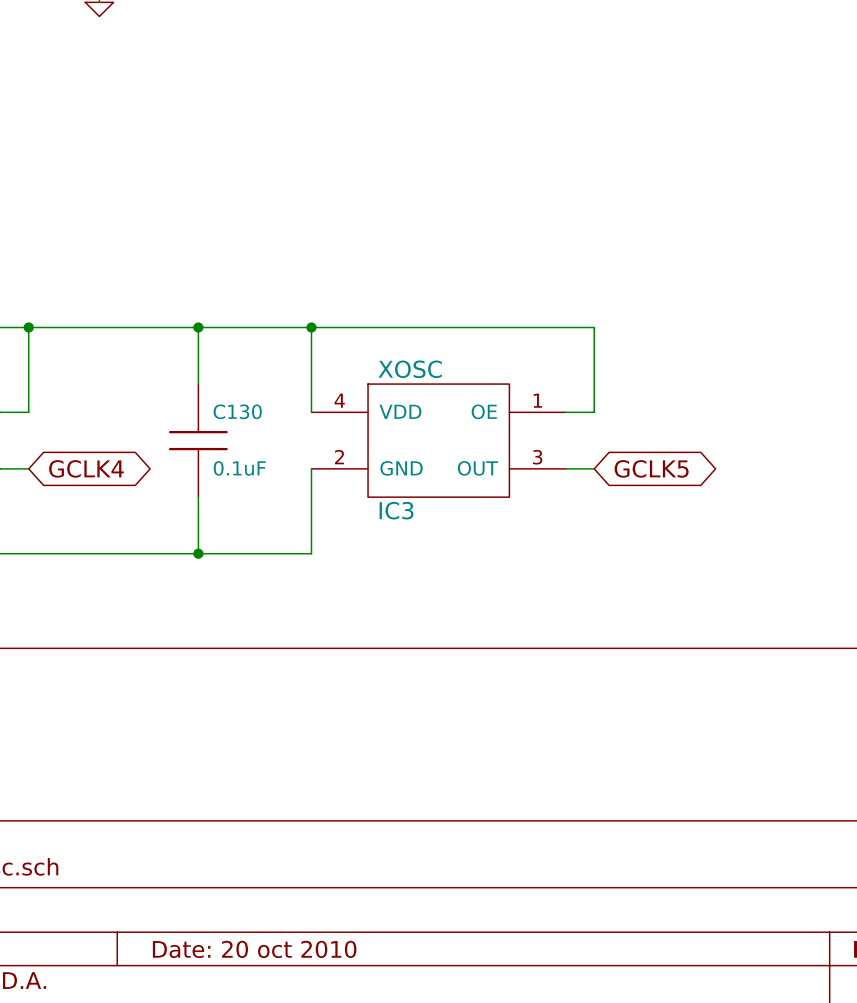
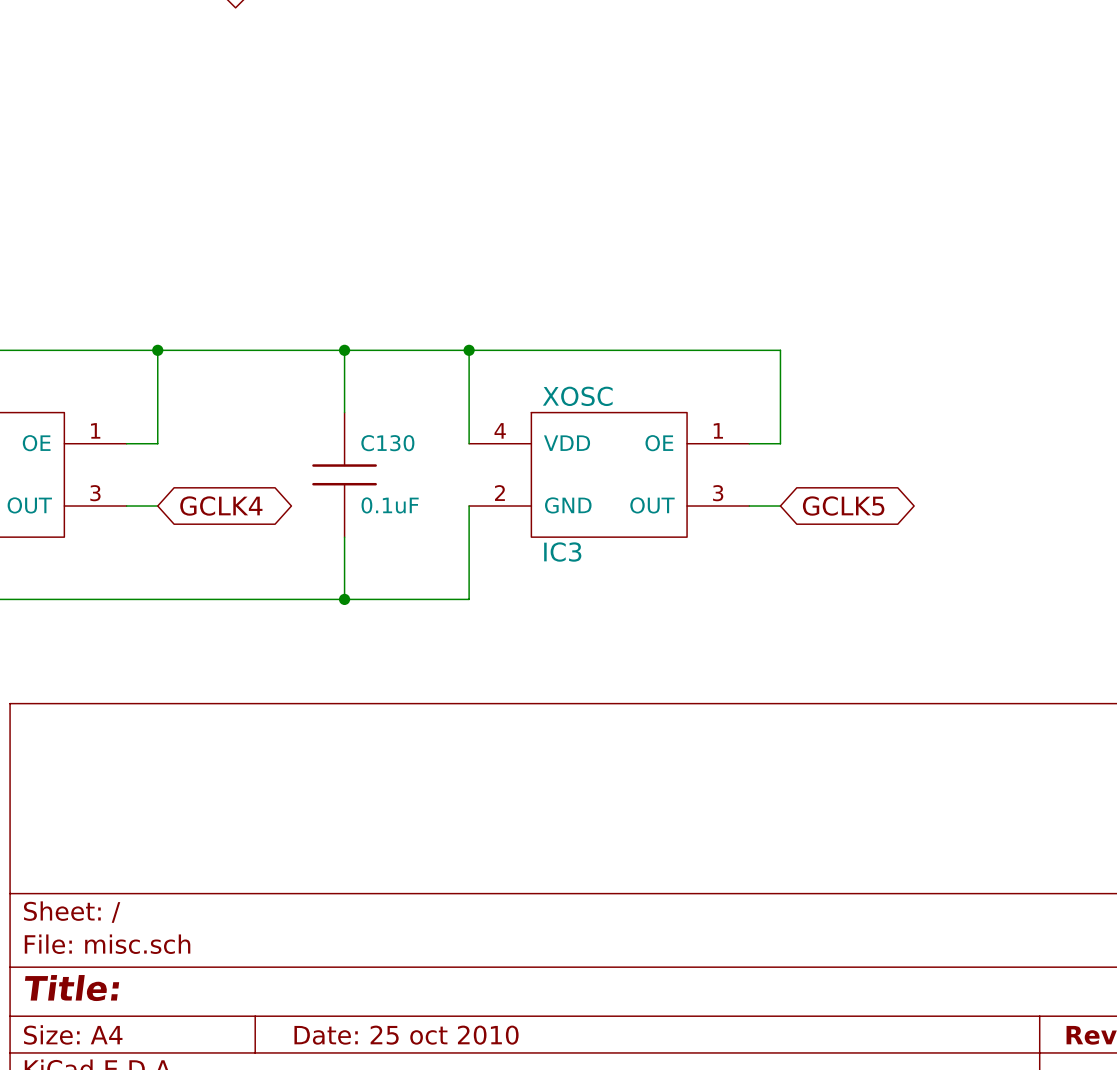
title block: Date: 20 oct 2010 (254, 949) -> Date: 25 oct 2010 (406, 1035)

